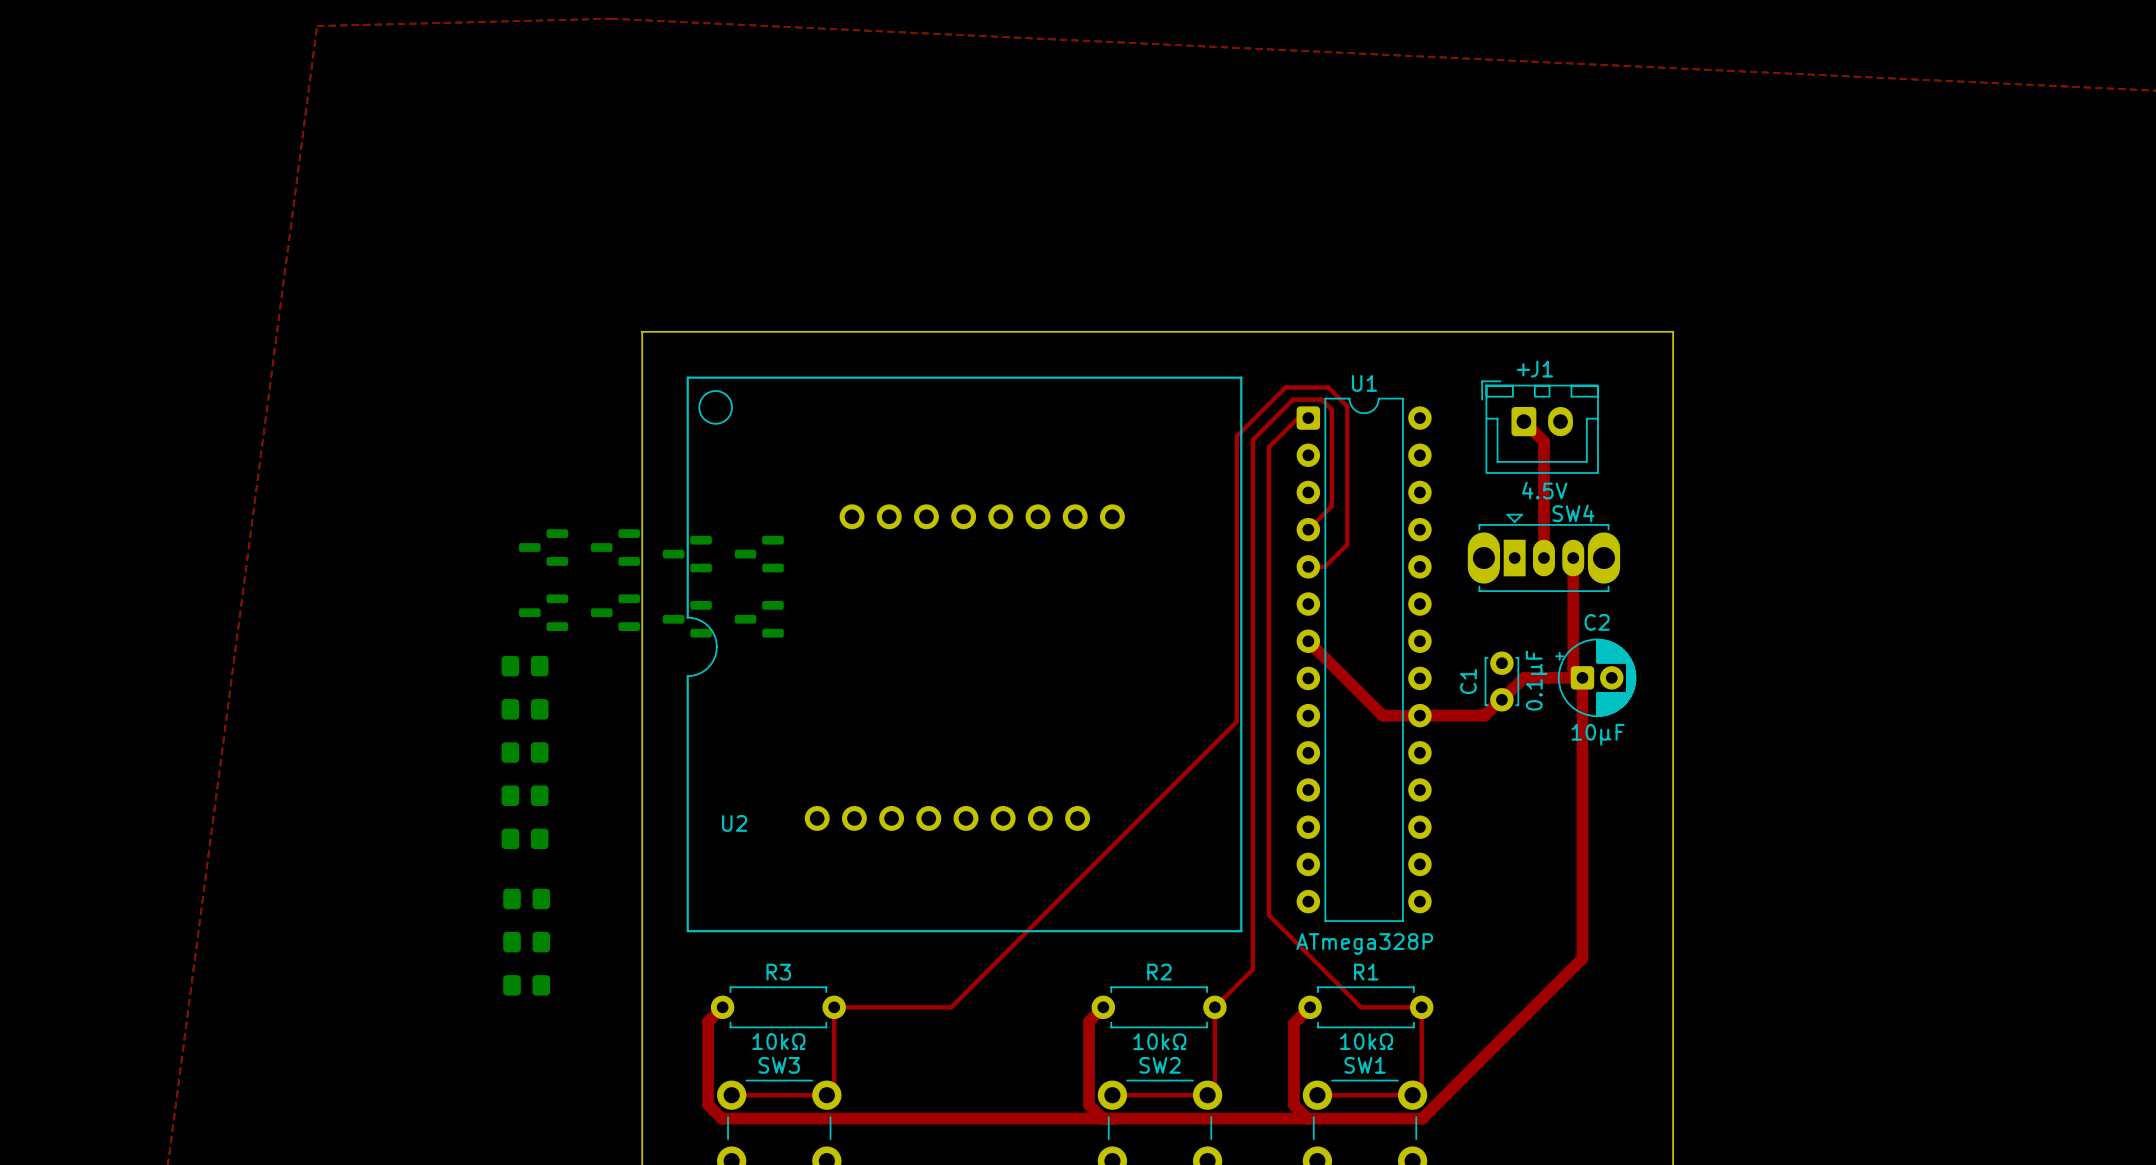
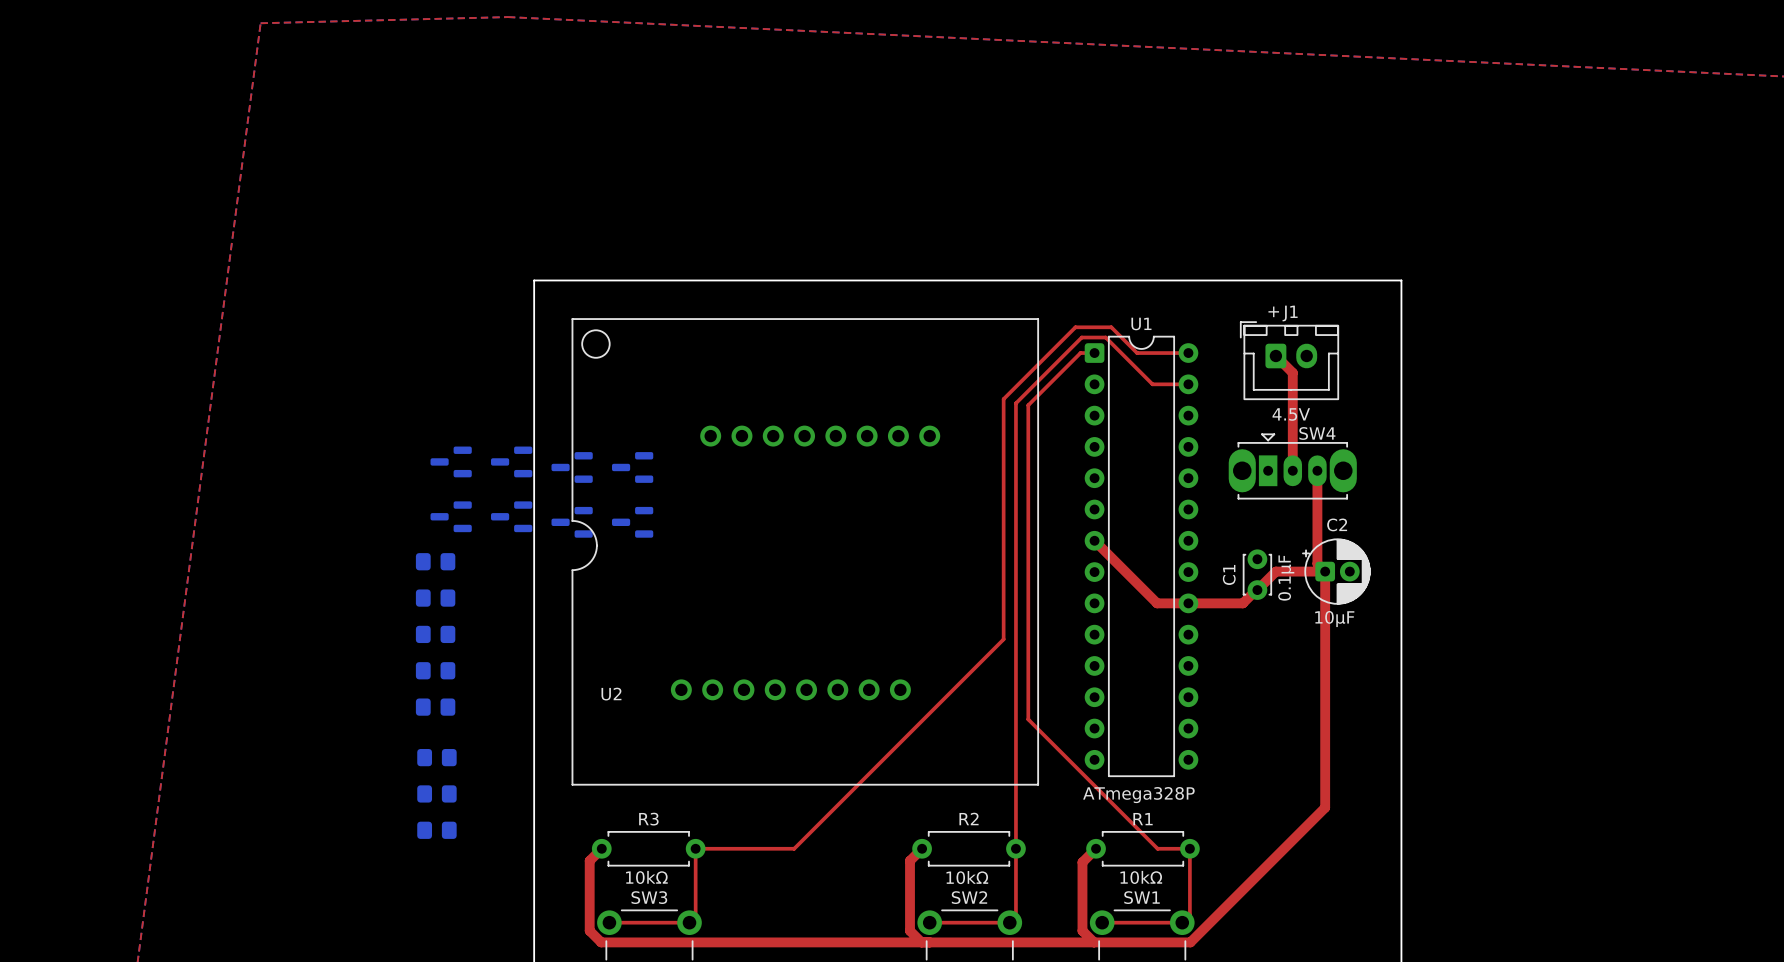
top track: (1347, 406) (1347, 544) (1324, 566) (1308, 566) -> (1127, 343) (1137, 353) (1188, 353)
top track: (1331, 409) (1331, 506) (1308, 529) -> (1114, 346) (1152, 384) (1188, 384)
top track: (1298, 418) (1268, 447) (1268, 915) (1361, 1007) (1383, 1007) -> (1085, 353) (1080, 353) (1028, 405) (1028, 719) (1157, 848)
top track: (1236, 436) (1236, 721) (1200, 758) -> (1034, 368) (1003, 399) (1003, 639)
top track: (1252, 439) (1252, 969) (1214, 1007) -> (1047, 371) (1015, 403) (1015, 848)

